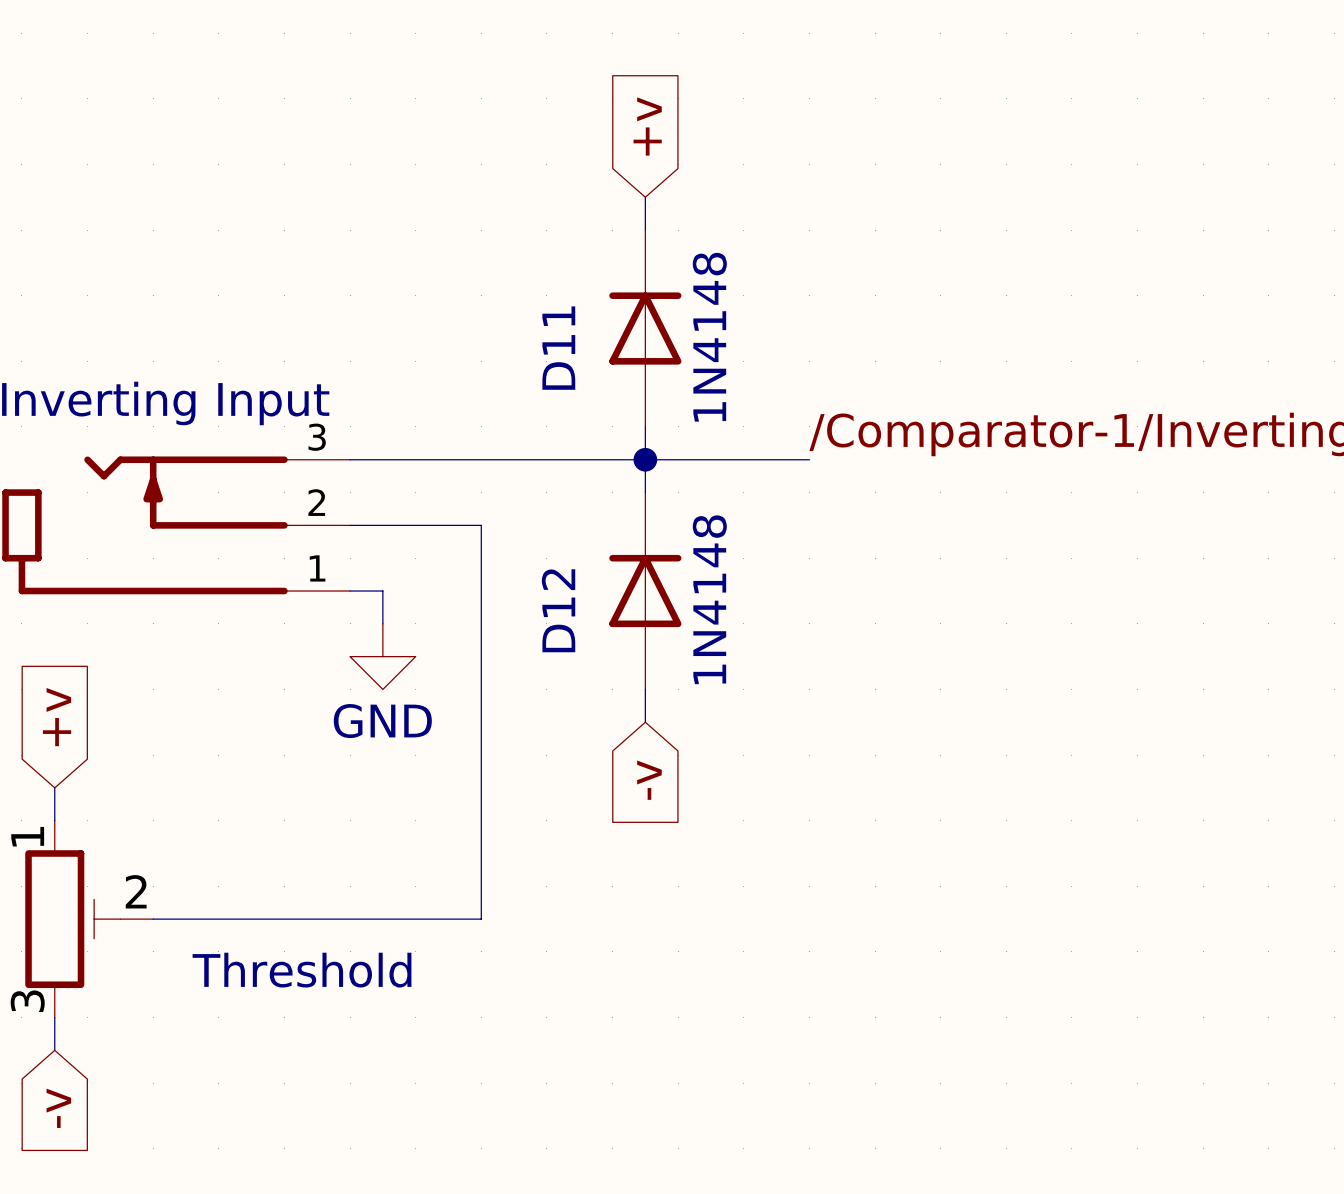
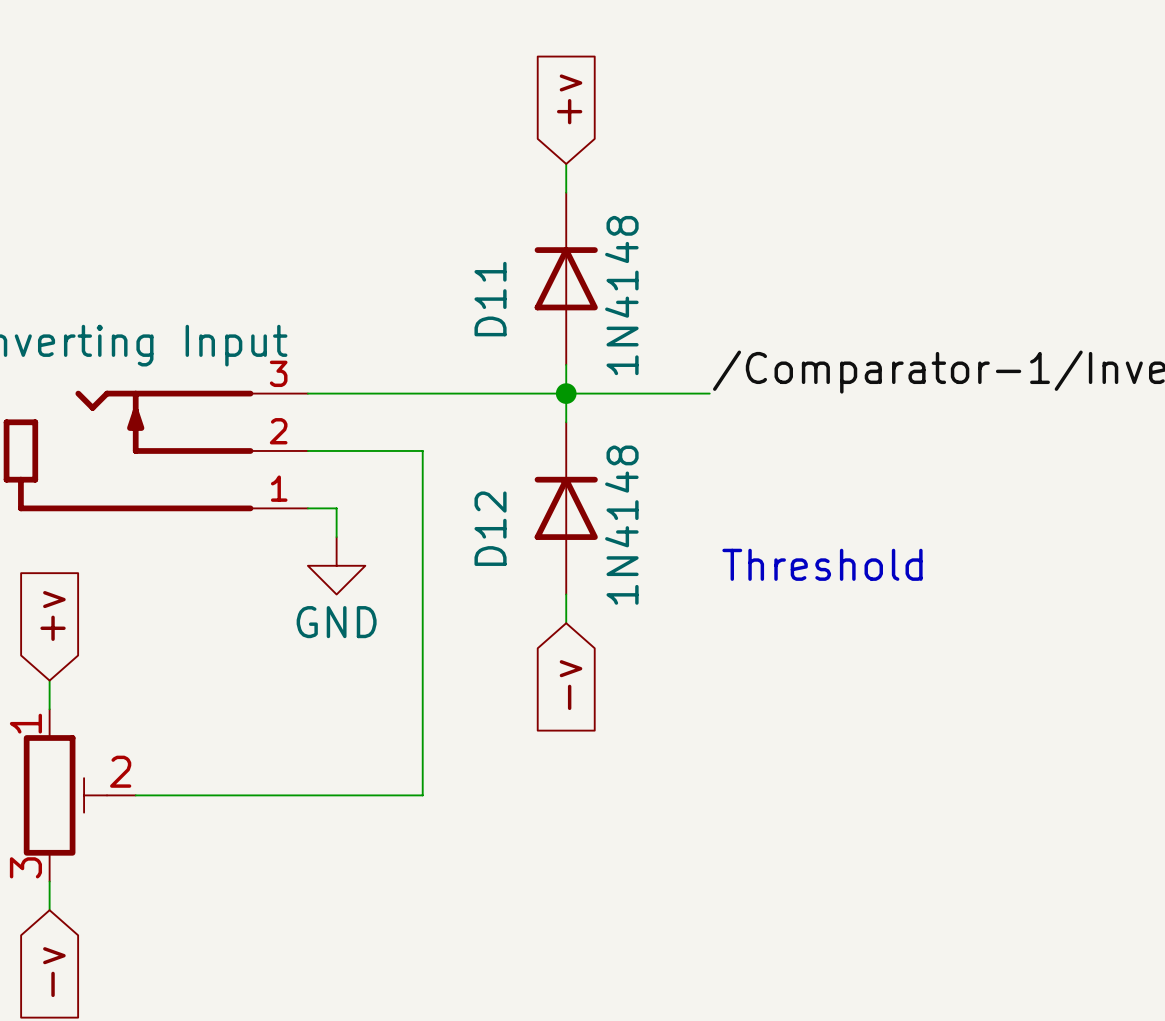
text: none -> Threshold (822, 564)
text: Threshold (302, 970) -> none

